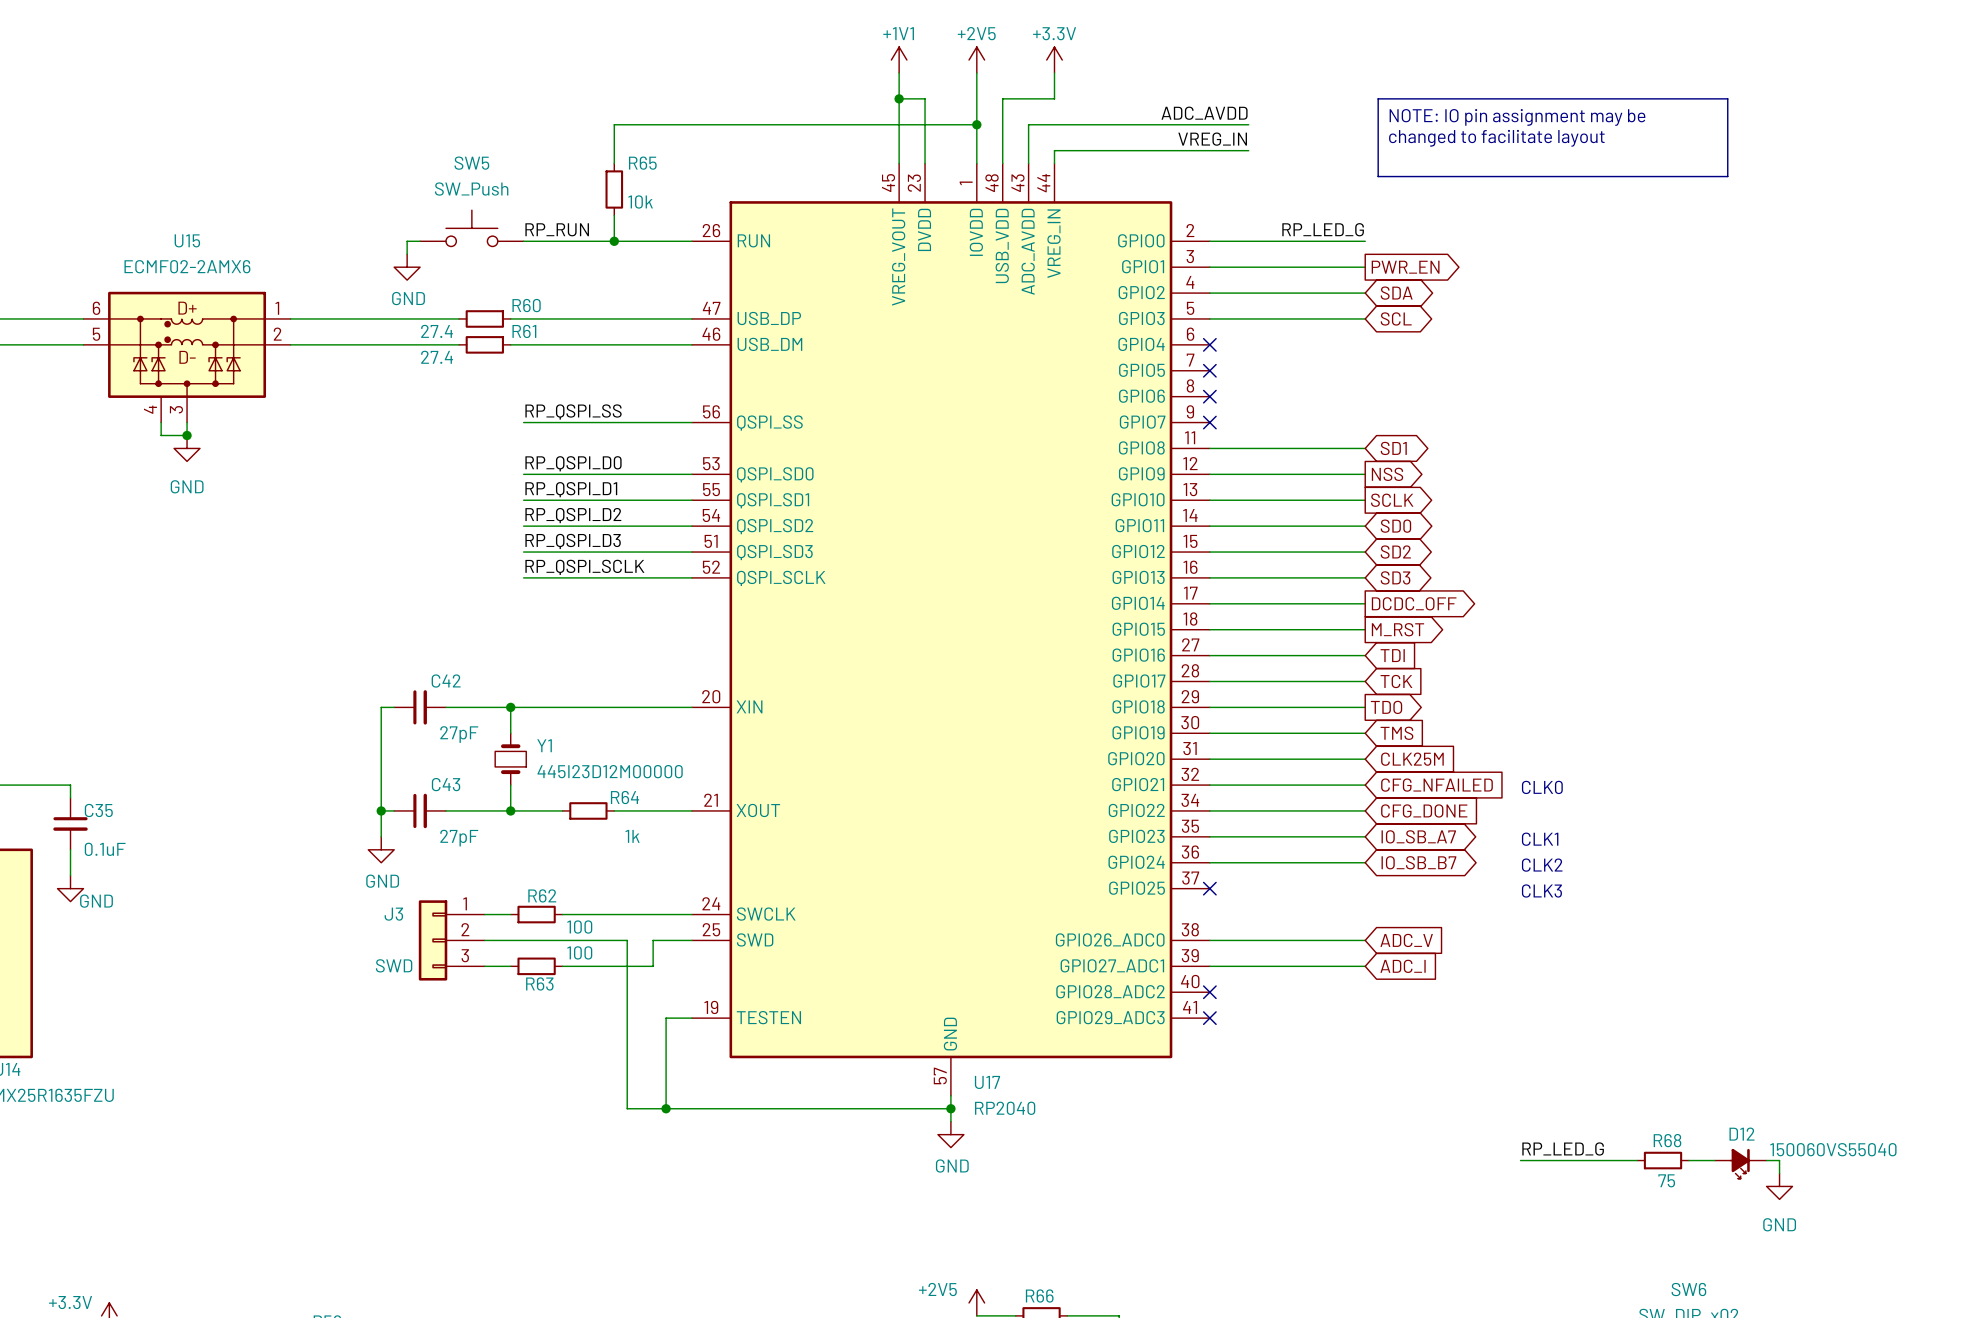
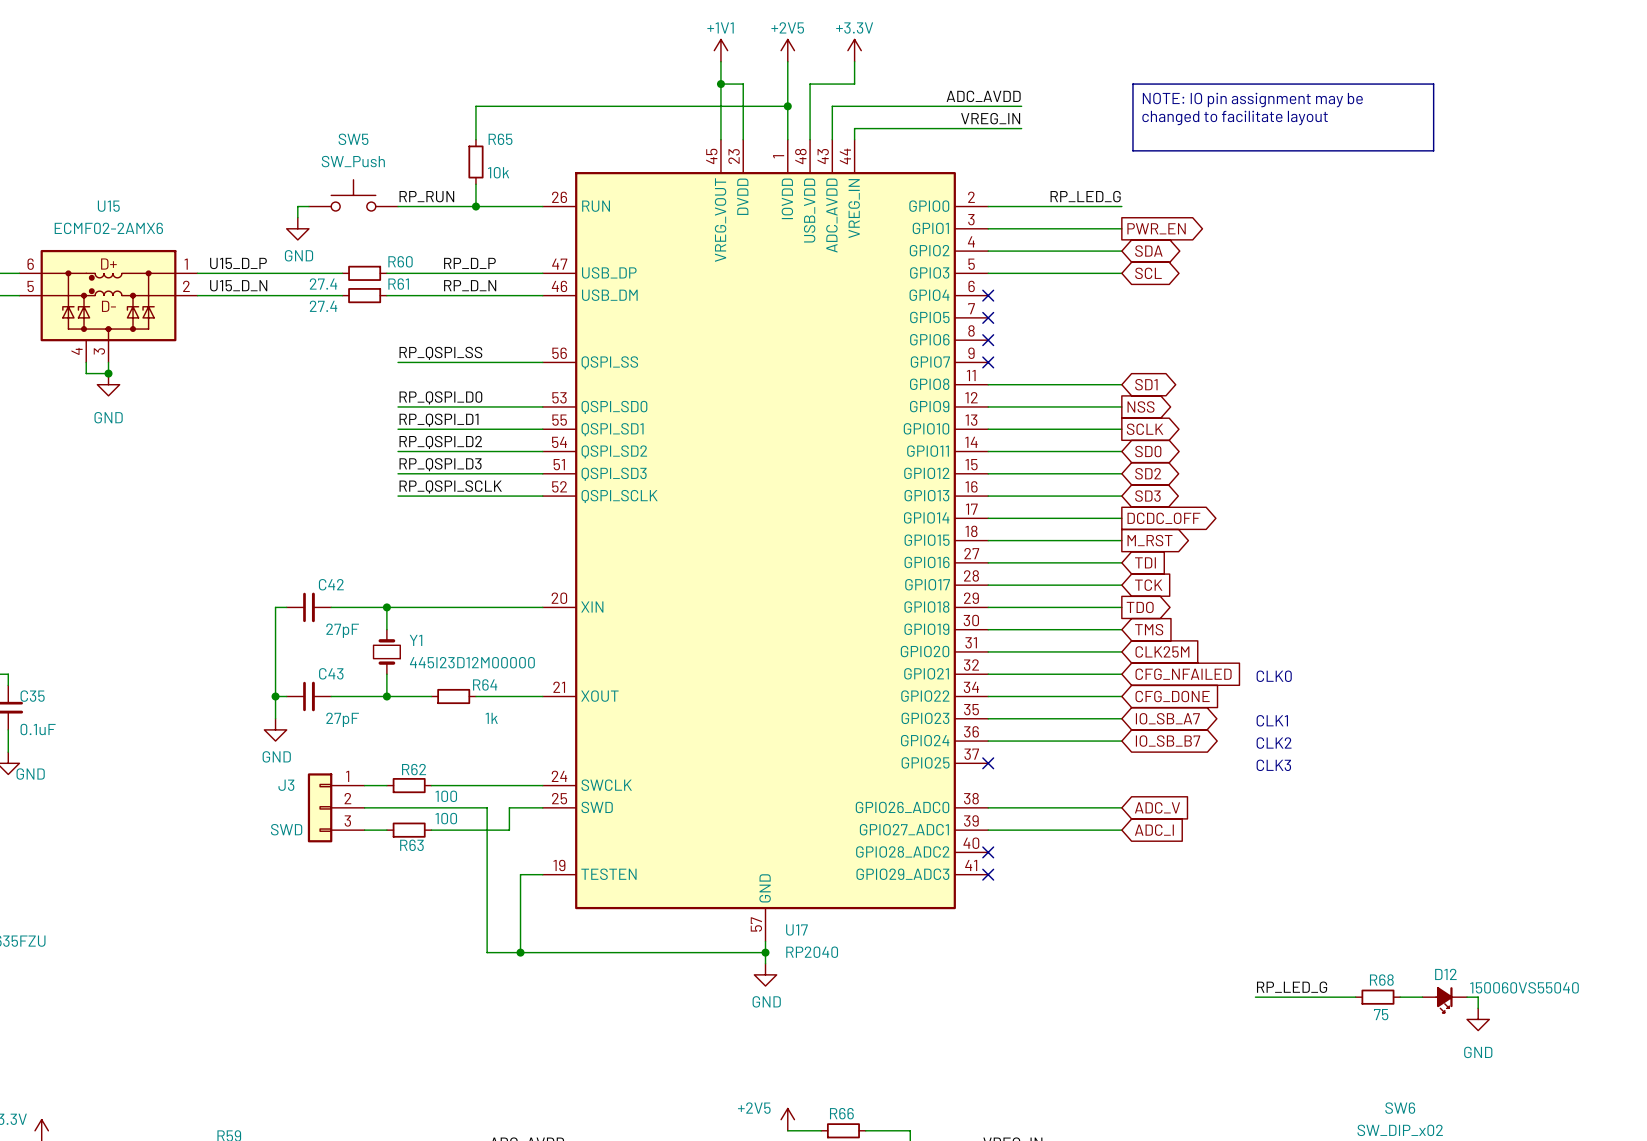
label: none -> U15_D_P (238, 263)
label: none -> RP_D_P (469, 263)
label: none -> U15_D_N (238, 285)
label: none -> RP_D_N (470, 285)

